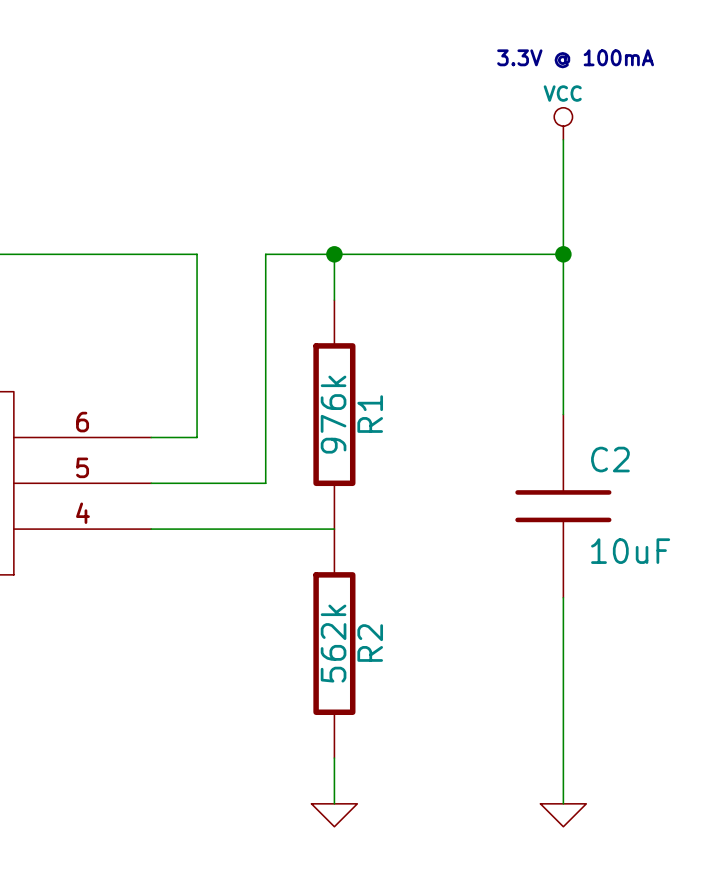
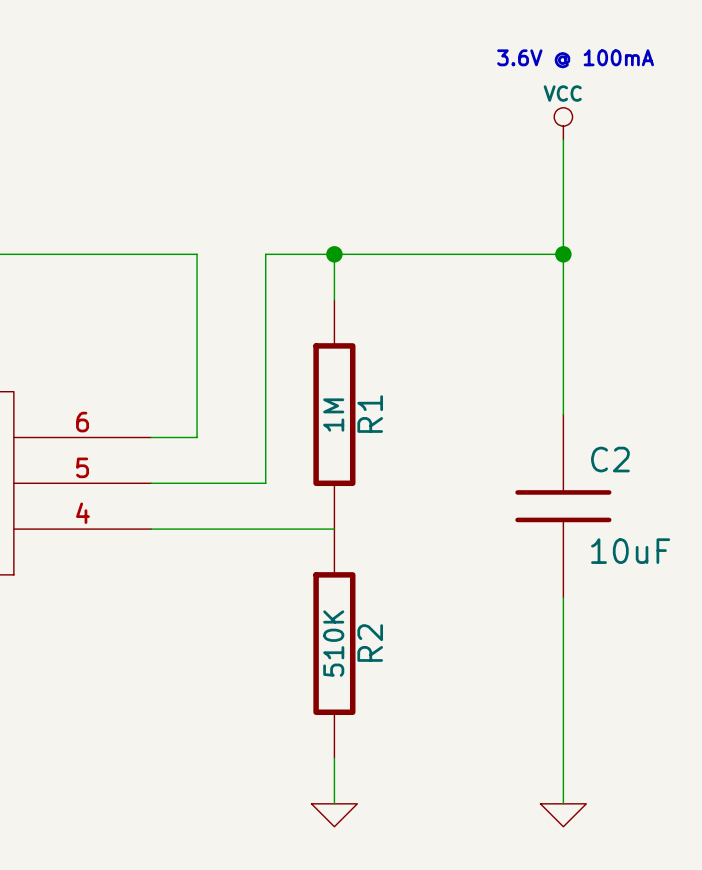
text: 3.3V @ 100mA (575, 58) -> 3.6V @ 100mA (575, 58)
R1 value: 976k (333, 414) -> 1M (333, 415)
R2 value: 562k (333, 643) -> 510K (333, 643)

